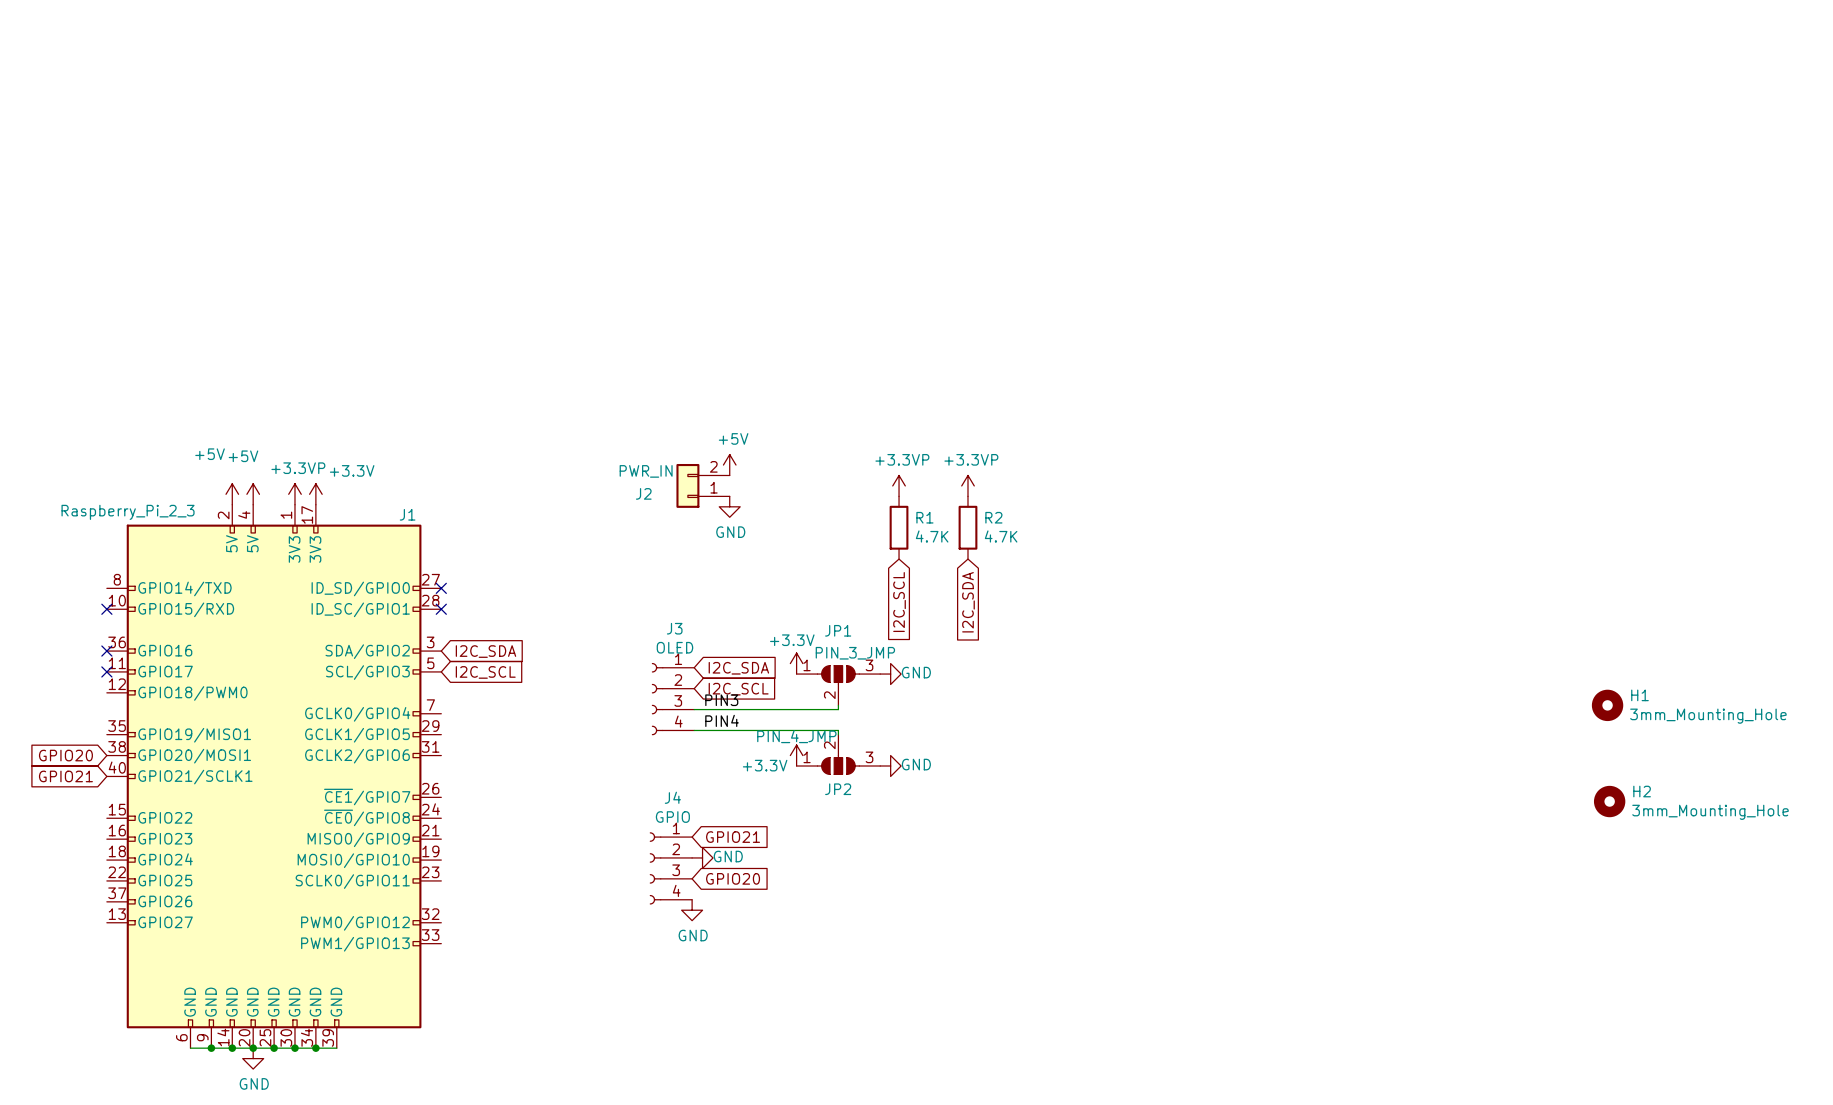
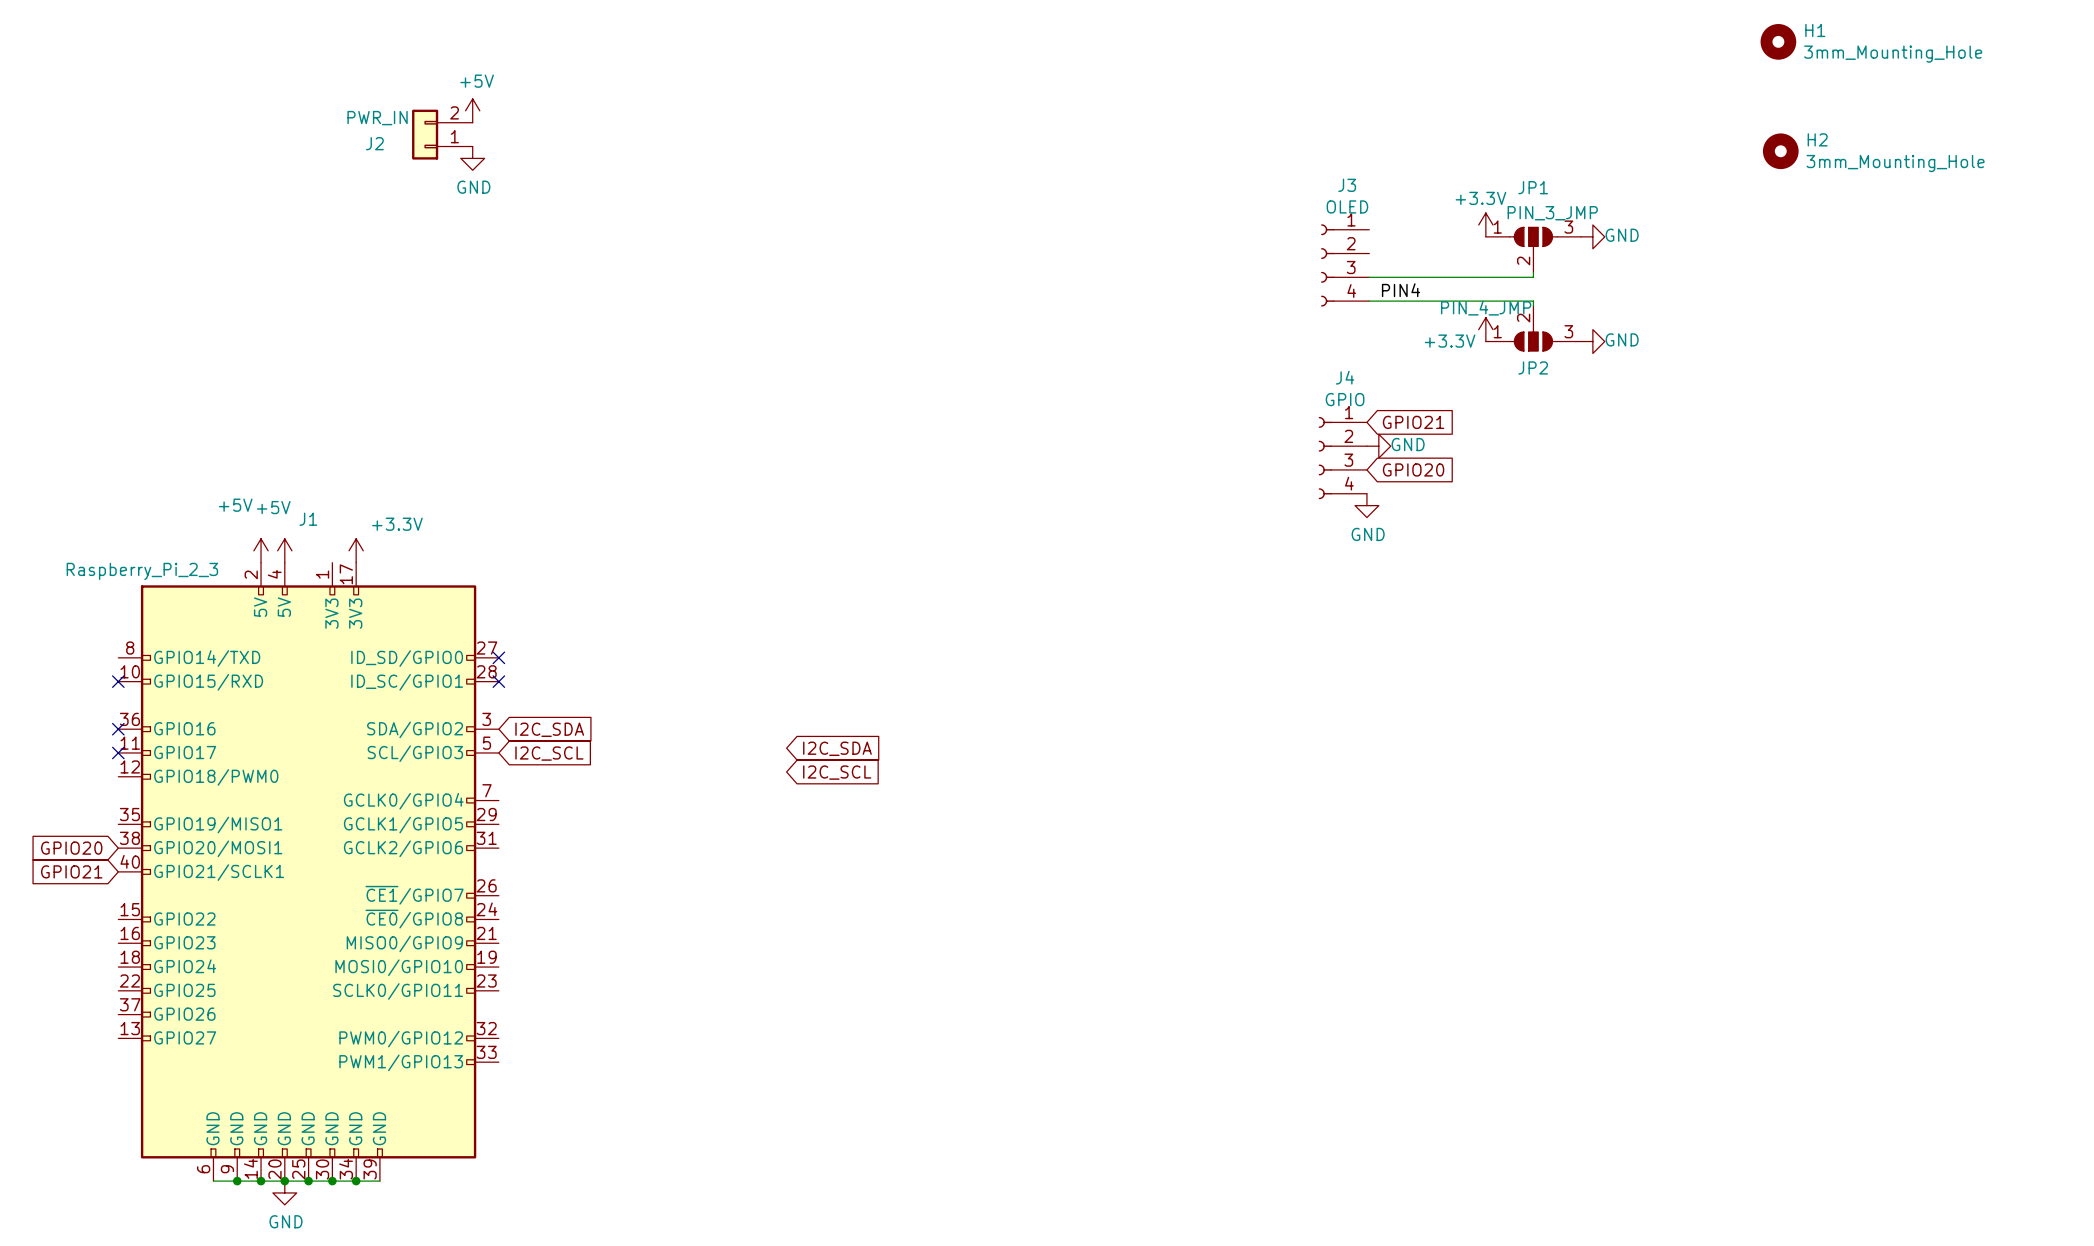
power symbol: none -> +5V (472, 110)
power symbol: none -> GND (472, 158)
power symbol: none -> +3.3V (1485, 224)
power symbol: none -> GND (1592, 236)
wire: none -> (1533, 272) (1533, 277) (1369, 277)
label: none -> PIN4 (1401, 290)
wire: none -> (1369, 301) (1533, 301) (1533, 305)
power symbol: none -> +3.3V (1485, 329)
power symbol: none -> GND (1592, 341)
global label: none -> GPIO21 (1413, 422)
power symbol: none -> GND (1378, 446)
global label: none -> GPIO20 (1413, 469)
power symbol: none -> GND (1366, 505)
power symbol: +5V (729, 465) -> none
J2 position: (703, 485) -> (442, 134)
power symbol: +3.3VP (899, 485) -> none
power symbol: +3.3VP (967, 485) -> none
power symbol: +3.3VP (294, 494) -> none
power symbol: GND (729, 506) -> none
J1 name position: J1 (407, 514) -> J1 (308, 519)
R1: 4.7K (899, 527) -> none
R2: 4.7K (967, 527) -> none
global label: I2C_SCL (899, 602) -> none
global label: I2C_SDA (968, 602) -> none
power symbol: +3.3V (796, 663) -> none
power symbol: GND (890, 674) -> none
JP1 position: (838, 685) -> (1533, 249)
J3 position: (672, 699) -> (1345, 265)
label: PIN3 (721, 700) -> none
wire: (838, 705) (838, 709) (694, 709) -> none
H1 position: (1607, 705) -> (1778, 41)
label: PIN4 (722, 720) -> none
wire: (694, 730) (838, 730) (838, 734) -> none
JP2 position: (838, 754) -> (1533, 328)
power symbol: +3.3V (796, 755) -> none
power symbol: GND (890, 766) -> none
H2 position: (1609, 801) -> (1780, 151)
global label: GPIO21 (733, 837) -> none
power symbol: GND (702, 857) -> none
J4 position: (670, 868) -> (1342, 458)
global label: GPIO20 (733, 878) -> none
power symbol: GND (692, 910) -> none

